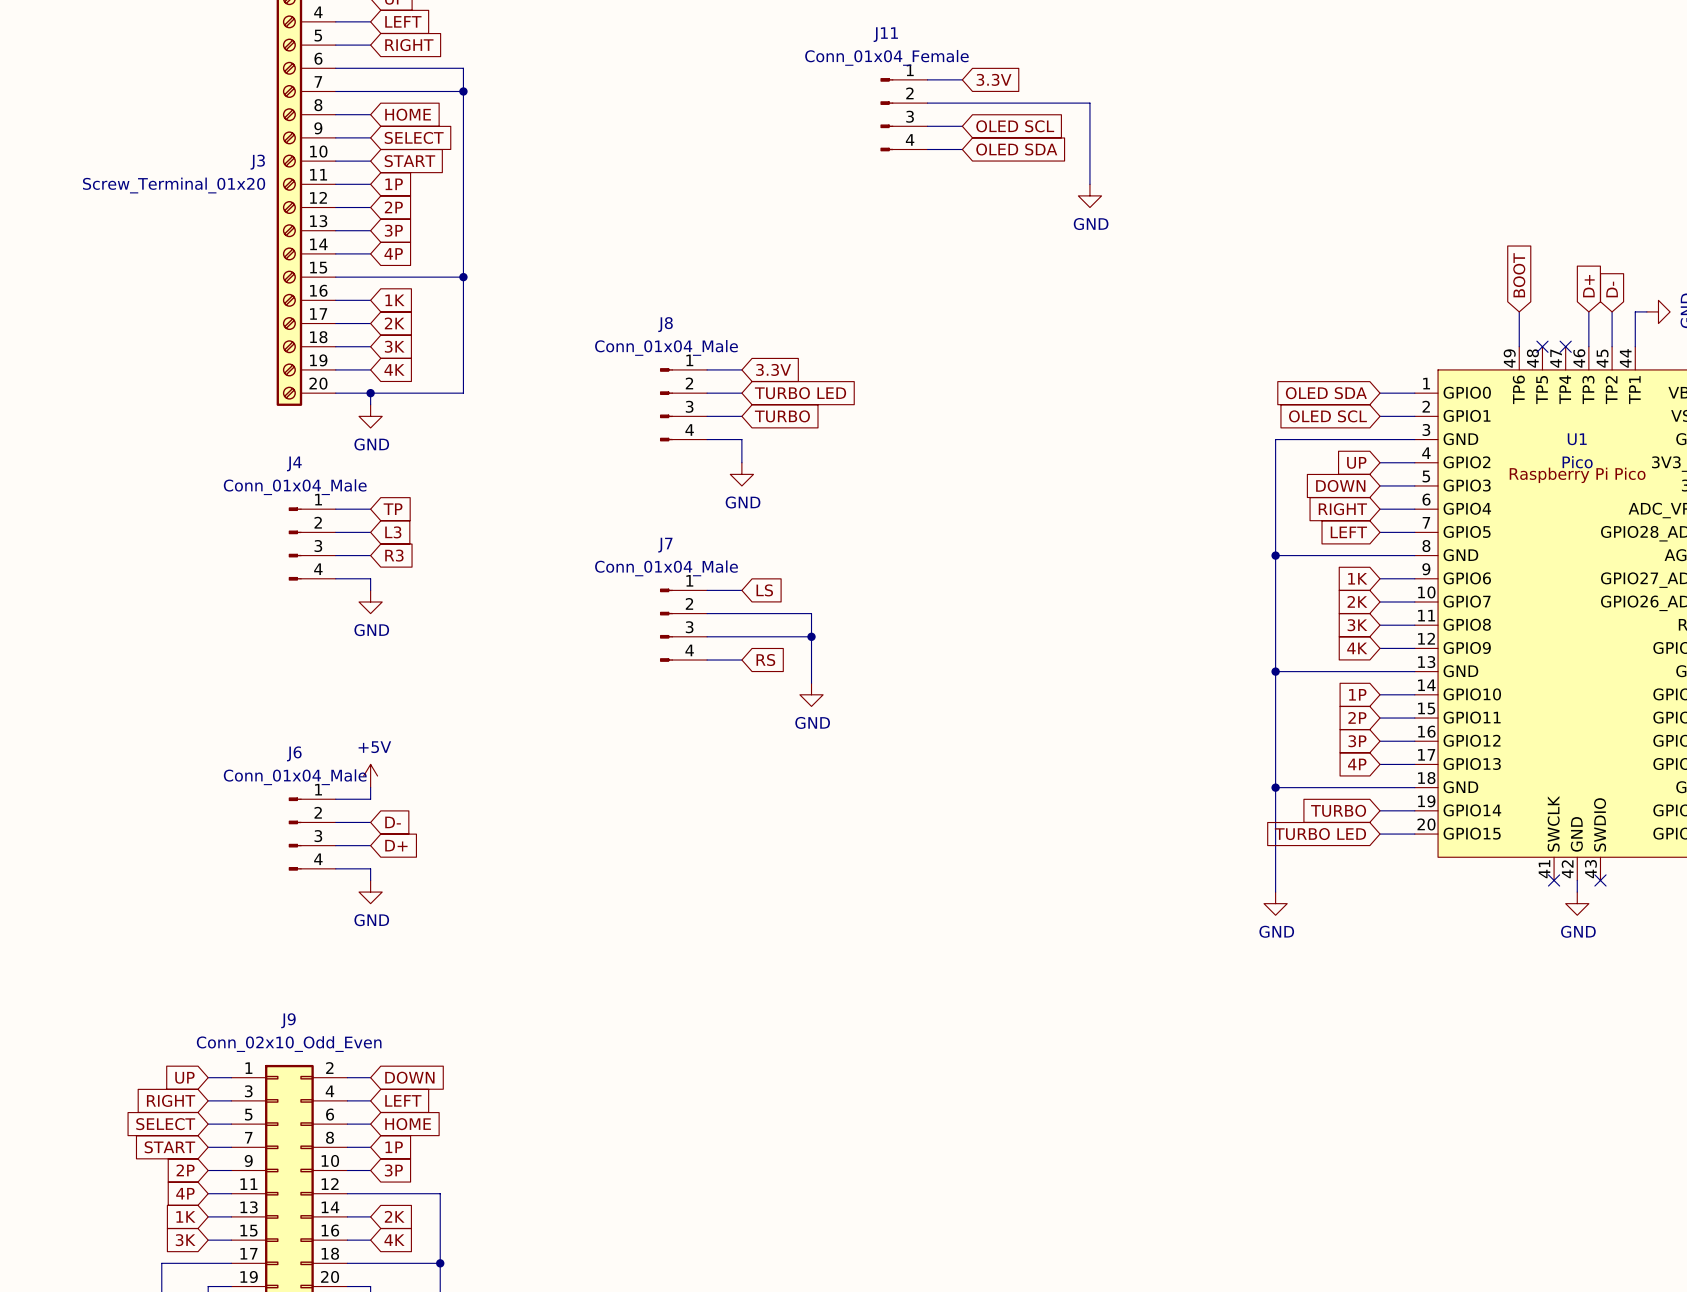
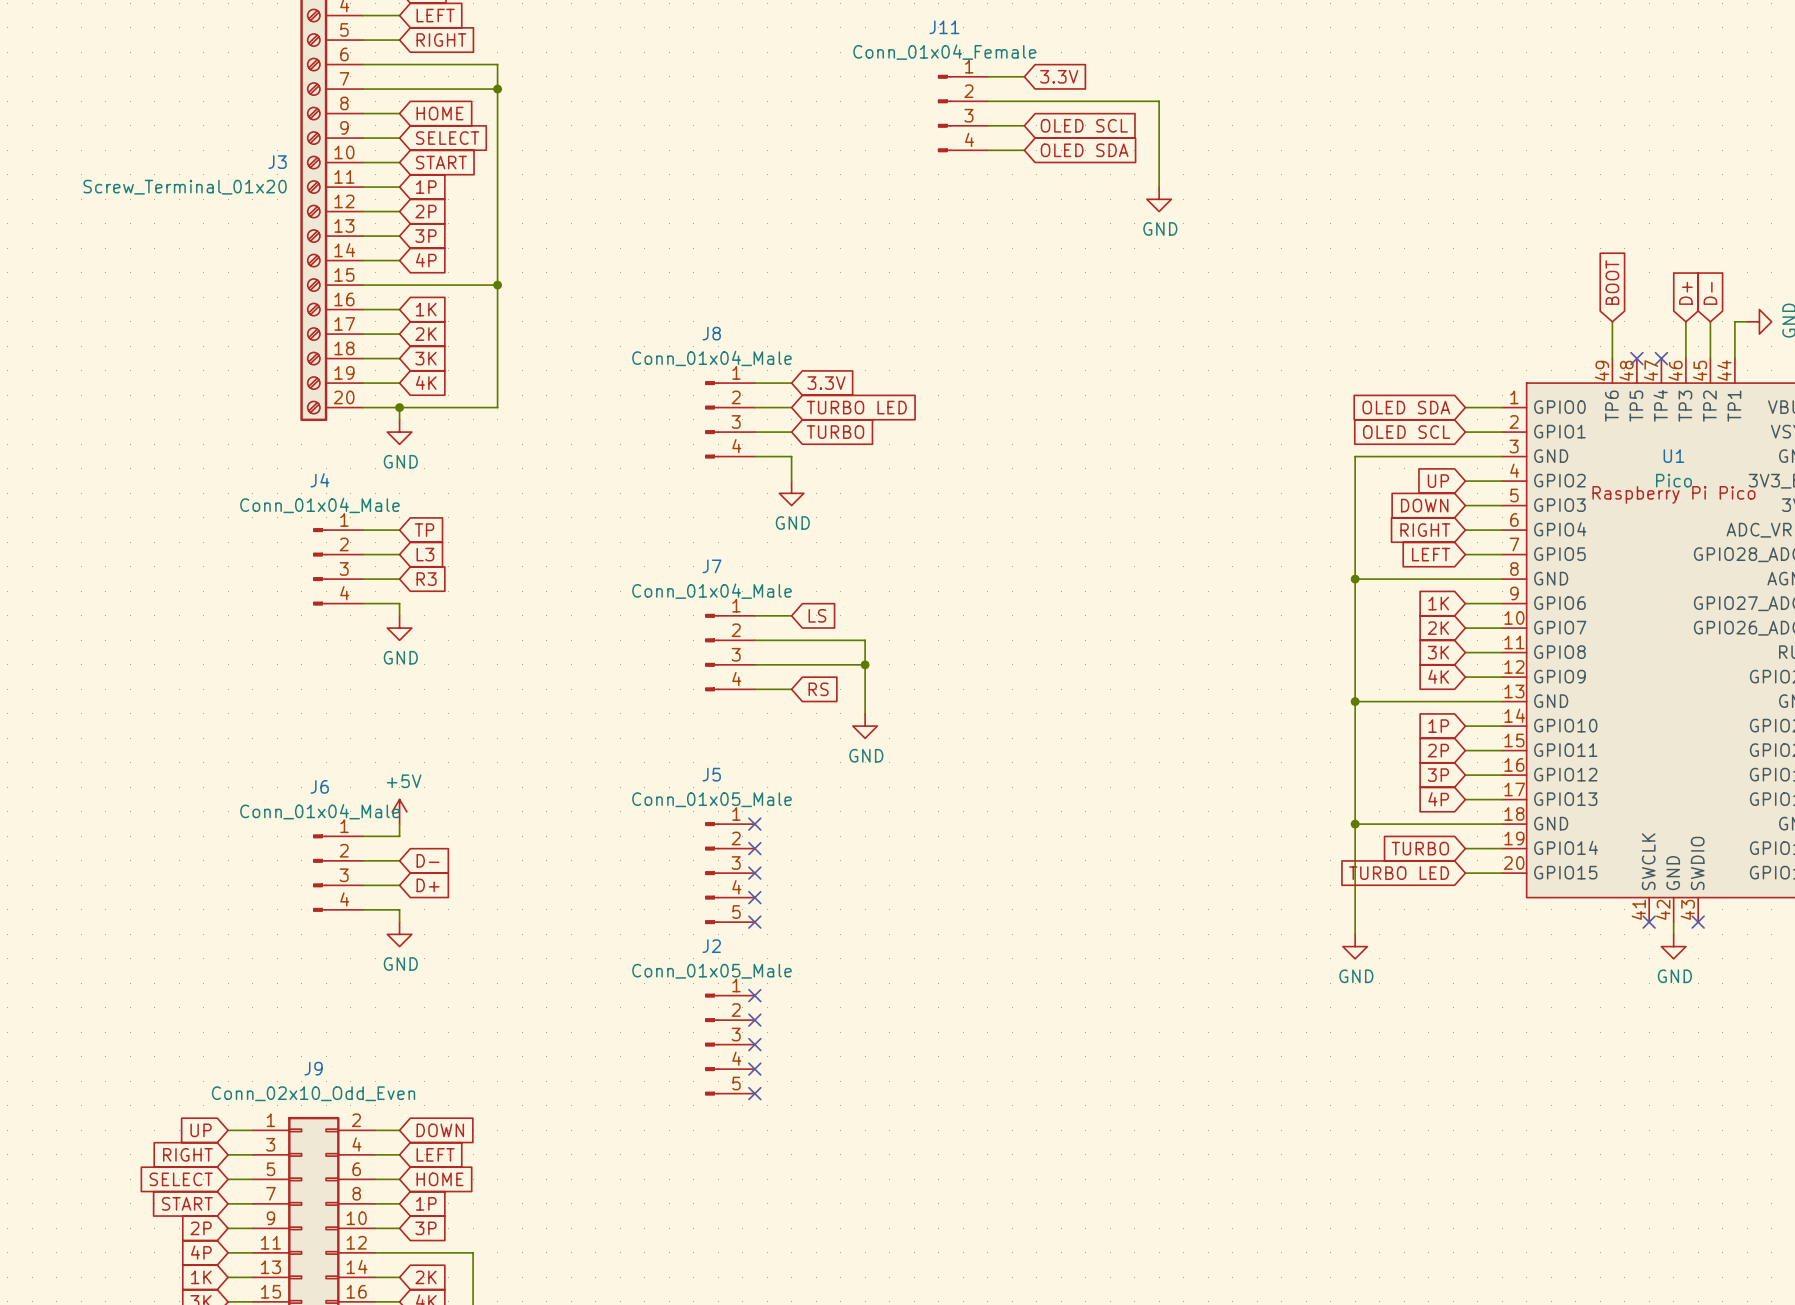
no-connect mark: none -> (754, 824)
no-connect mark: none -> (754, 848)
J5: none -> Conn_01x05_Male (729, 873)
no-connect mark: none -> (754, 873)
no-connect mark: none -> (754, 897)
no-connect mark: none -> (754, 922)
no-connect mark: none -> (754, 995)
no-connect mark: none -> (754, 1020)
J2: none -> Conn_01x05_Male (729, 1044)
no-connect mark: none -> (754, 1044)
no-connect mark: none -> (754, 1069)
no-connect mark: none -> (754, 1093)

